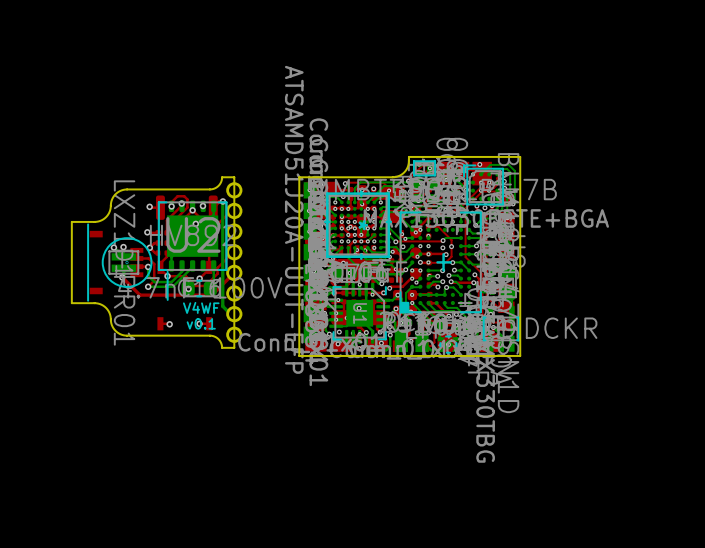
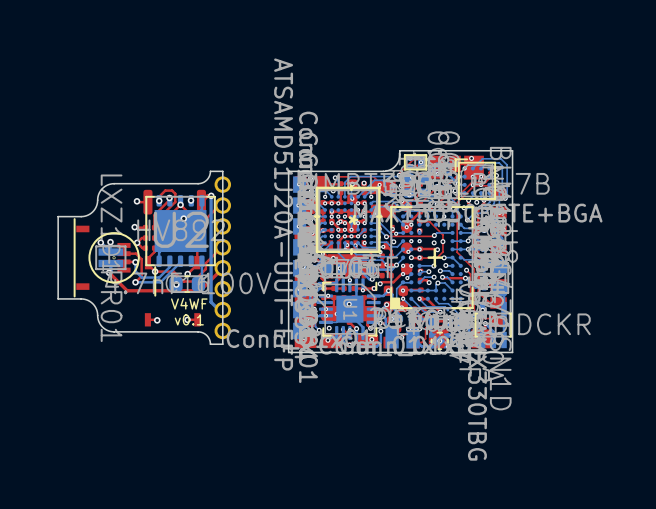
via: none -> (419, 298)
via: (456, 314) -> none

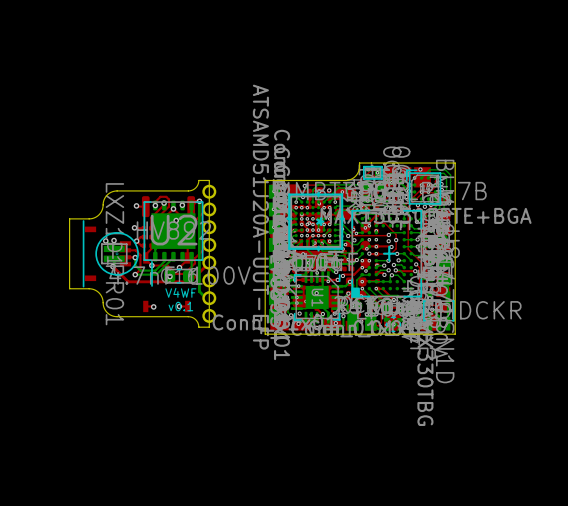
bottom track: (436, 298) (438, 303) (448, 303) (459, 314) (459, 317) -> none

